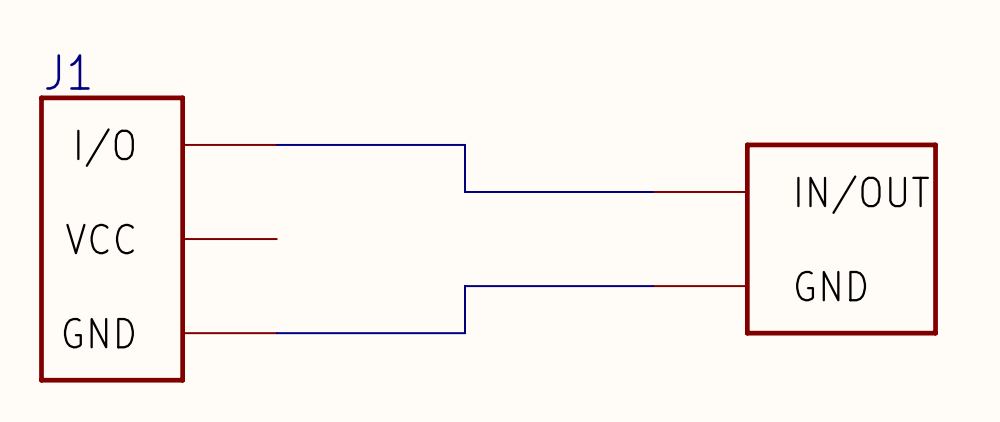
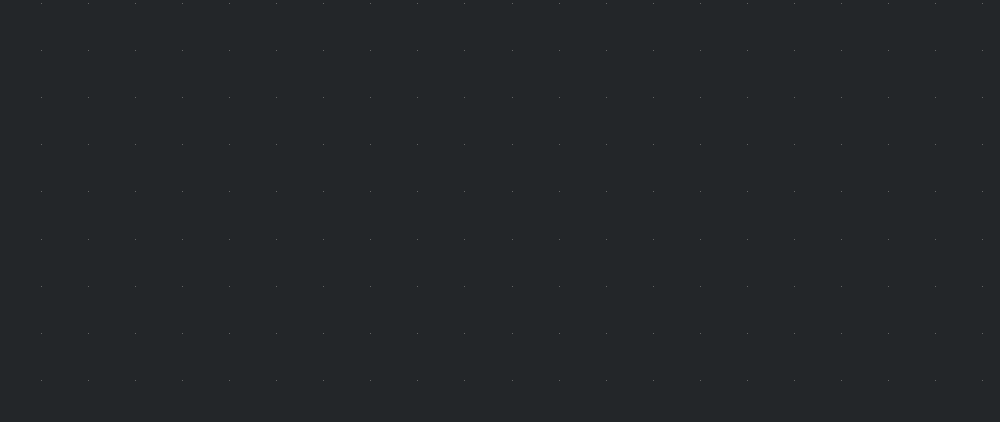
wire: (276, 144) (464, 144) (464, 191) (653, 191) -> none
J1: (157, 239) -> none
part: (795, 239) -> none
wire: (653, 286) (464, 286) (464, 333) (276, 333) -> none

